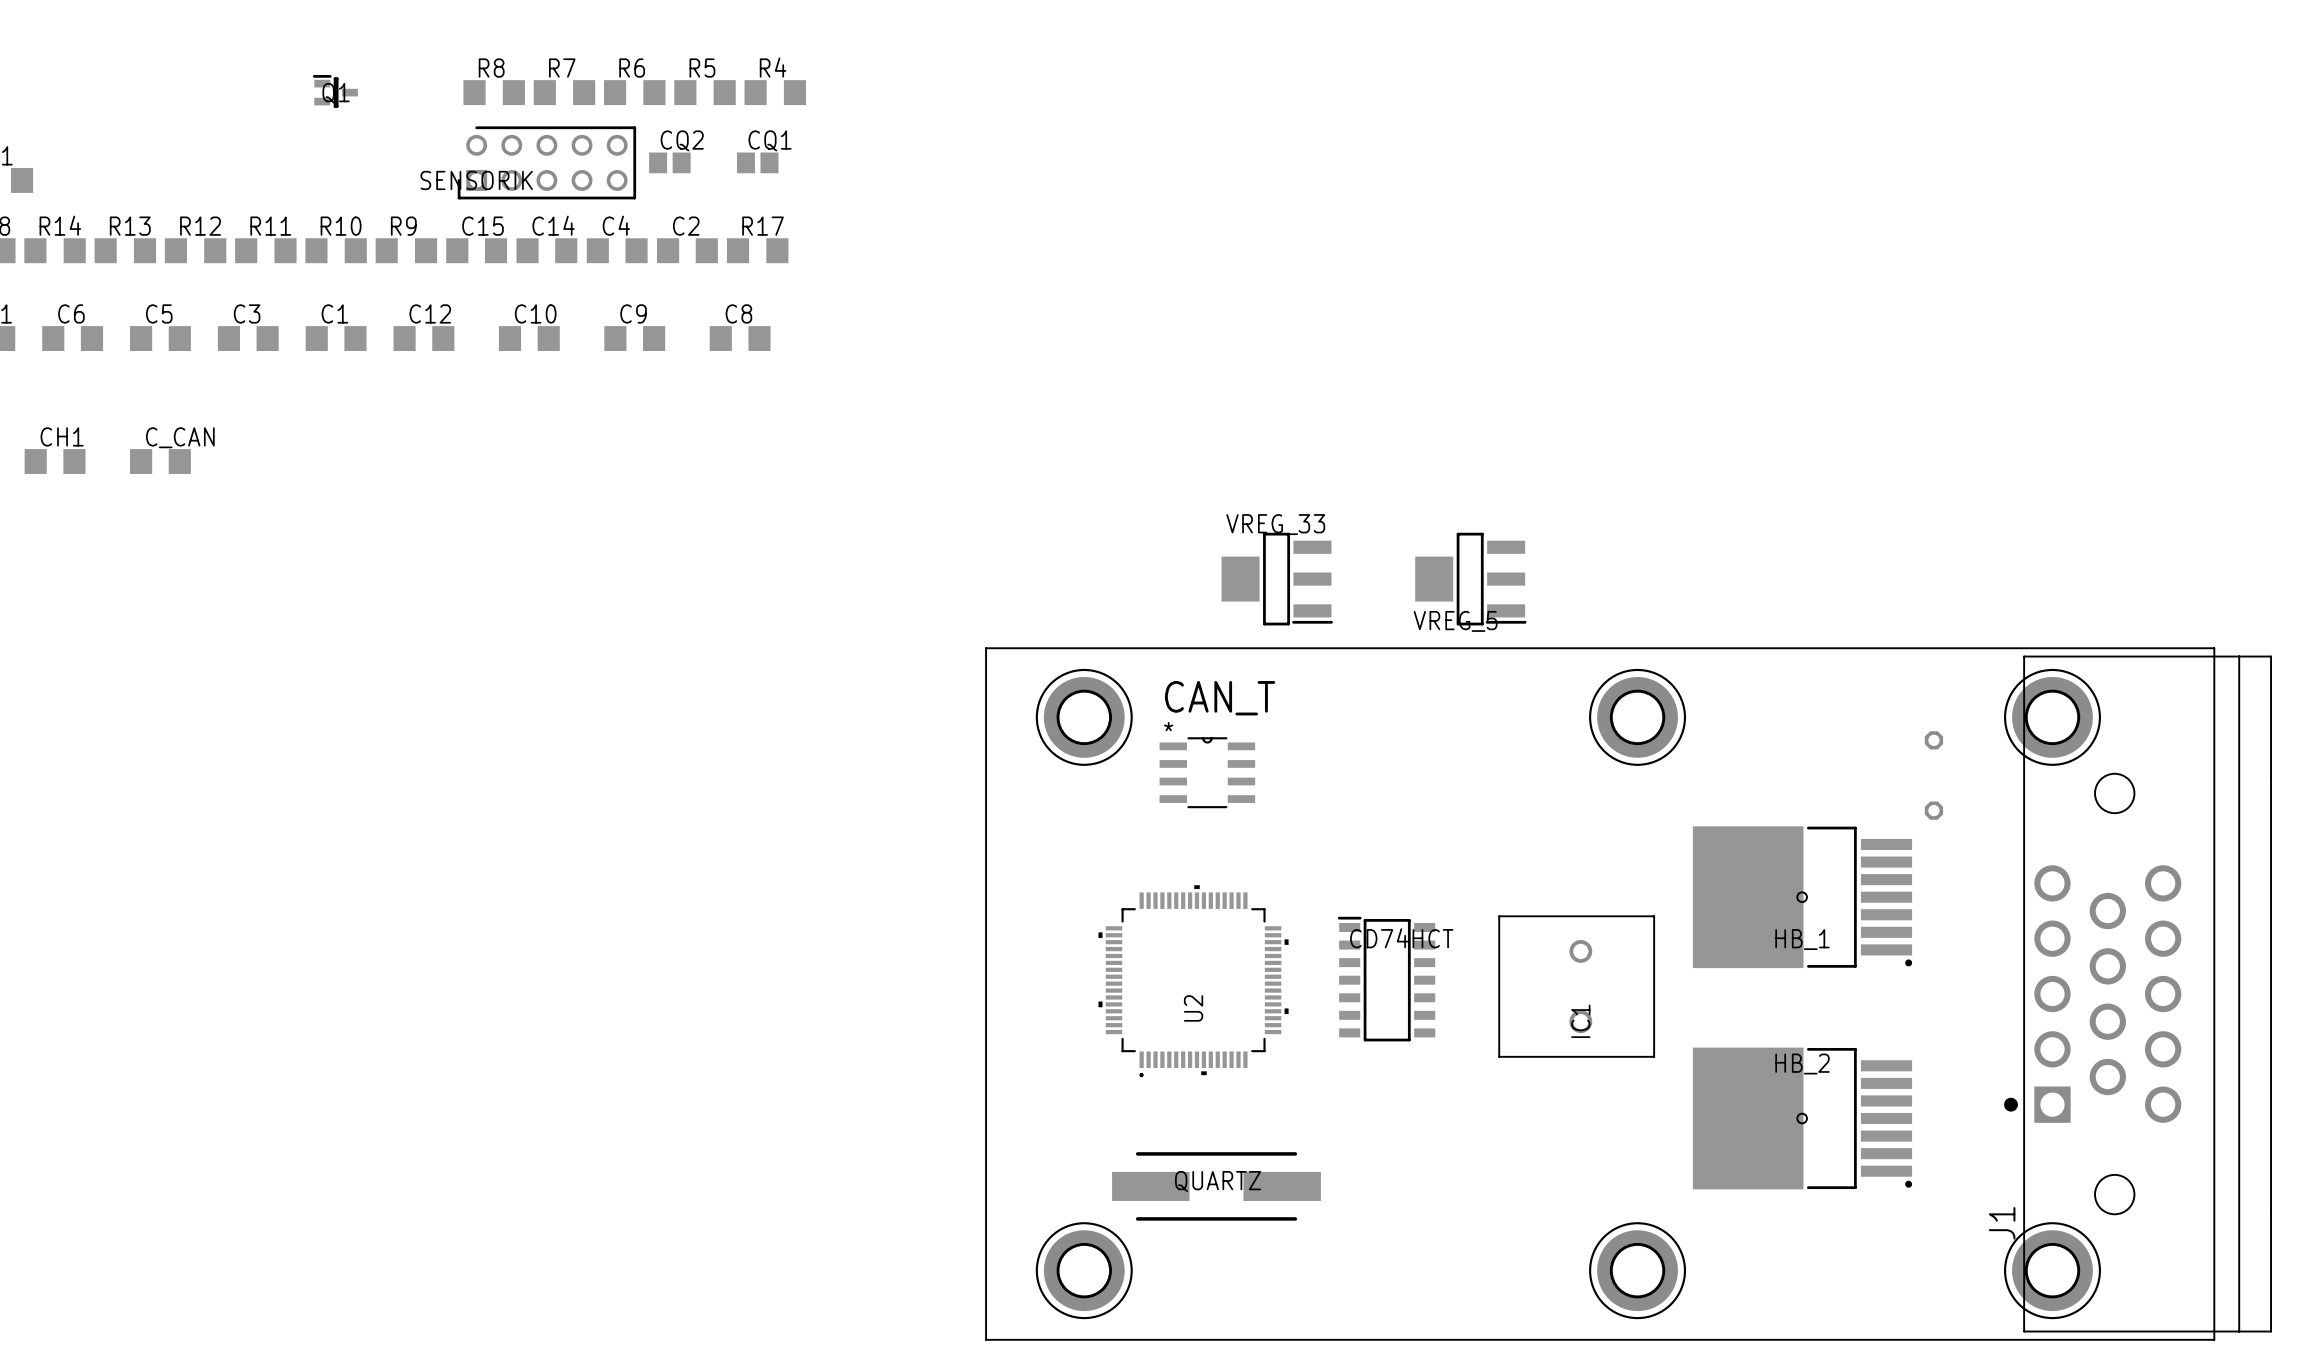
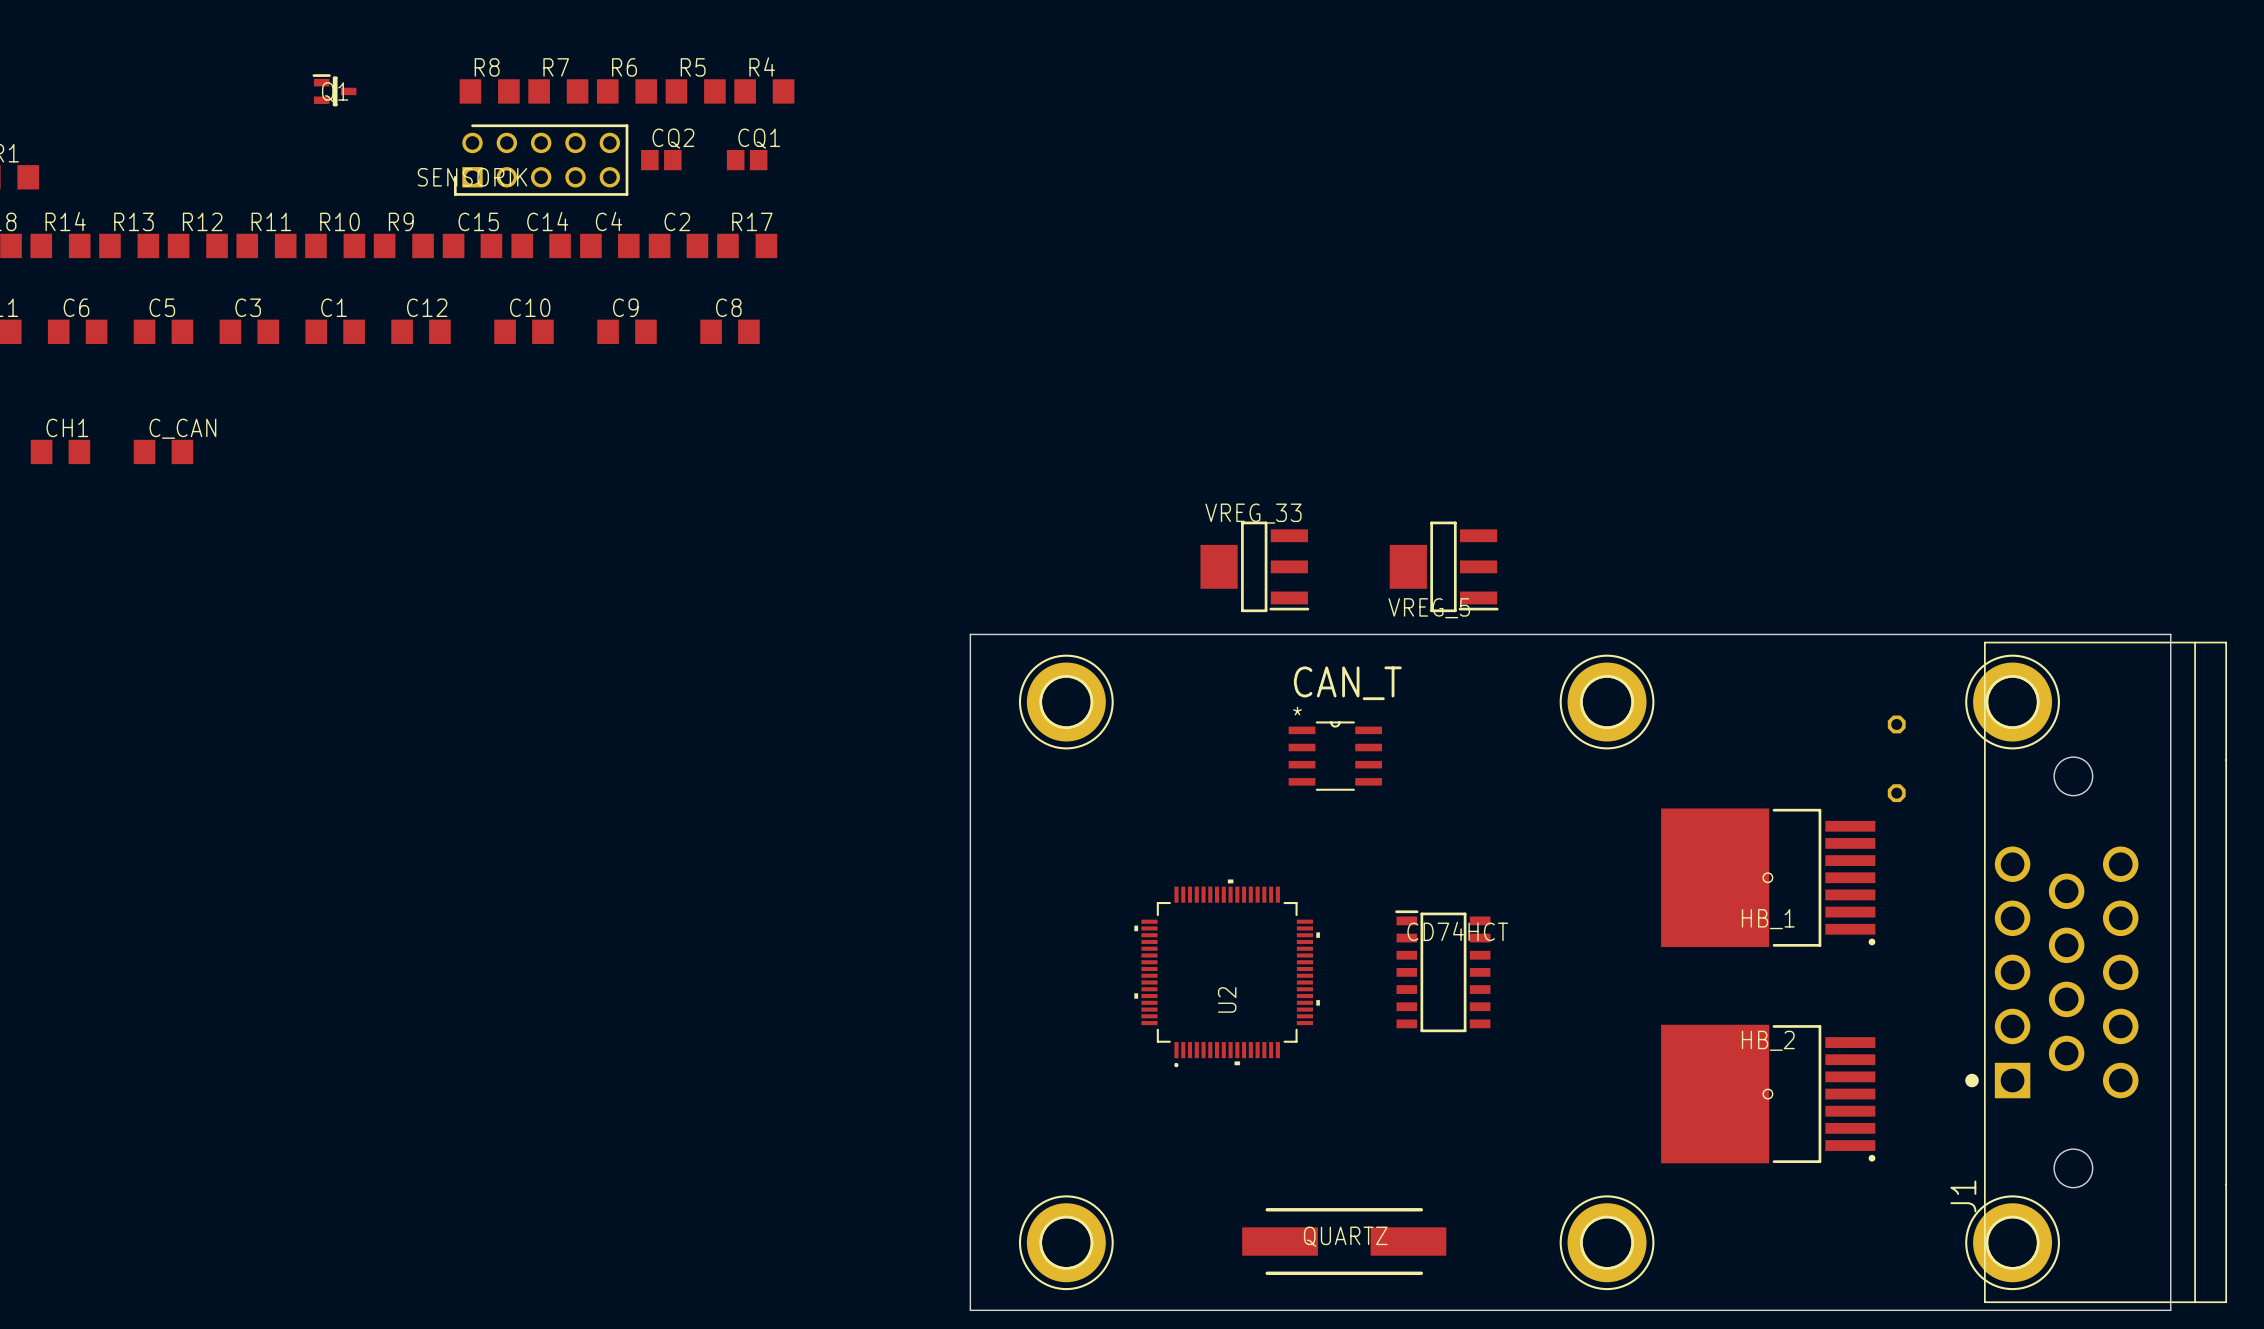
CAN_T position: (1207, 772) -> (1335, 756)
CD74HCT position: (1386, 979) -> (1442, 971)
U2 position: (1193, 981) -> (1227, 973)
IC1: (1576, 986) -> none
QUARTZ position: (1216, 1186) -> (1344, 1241)

